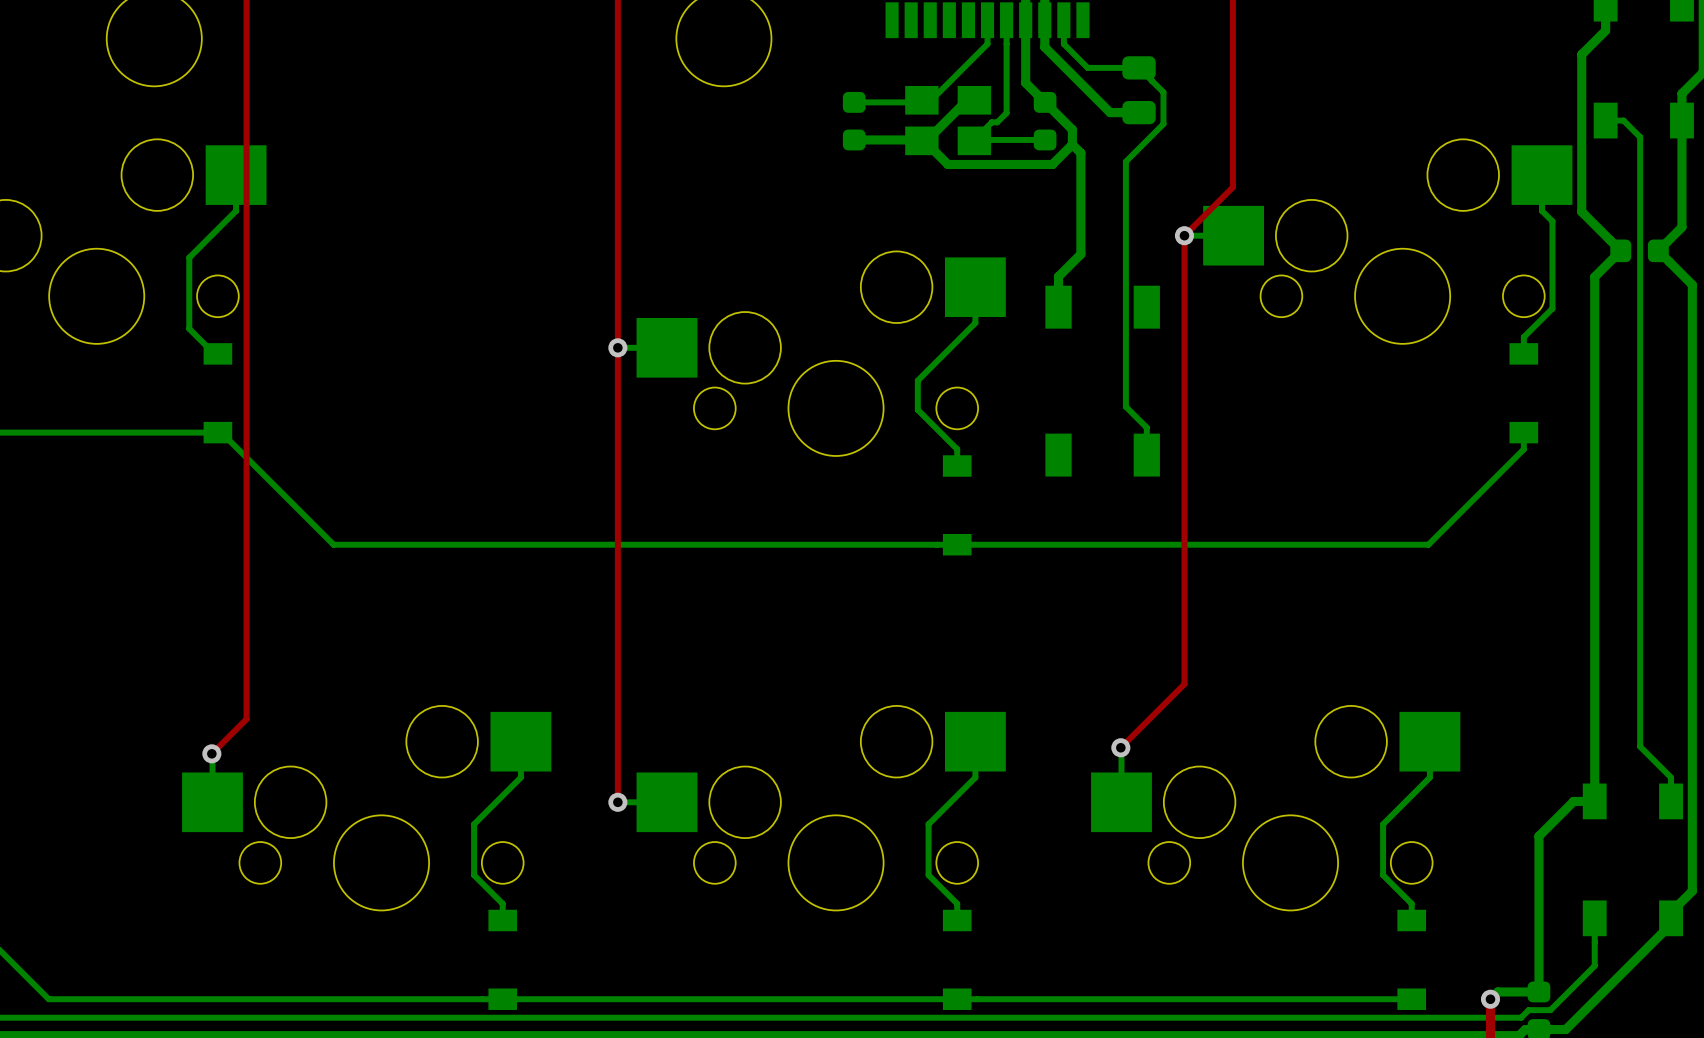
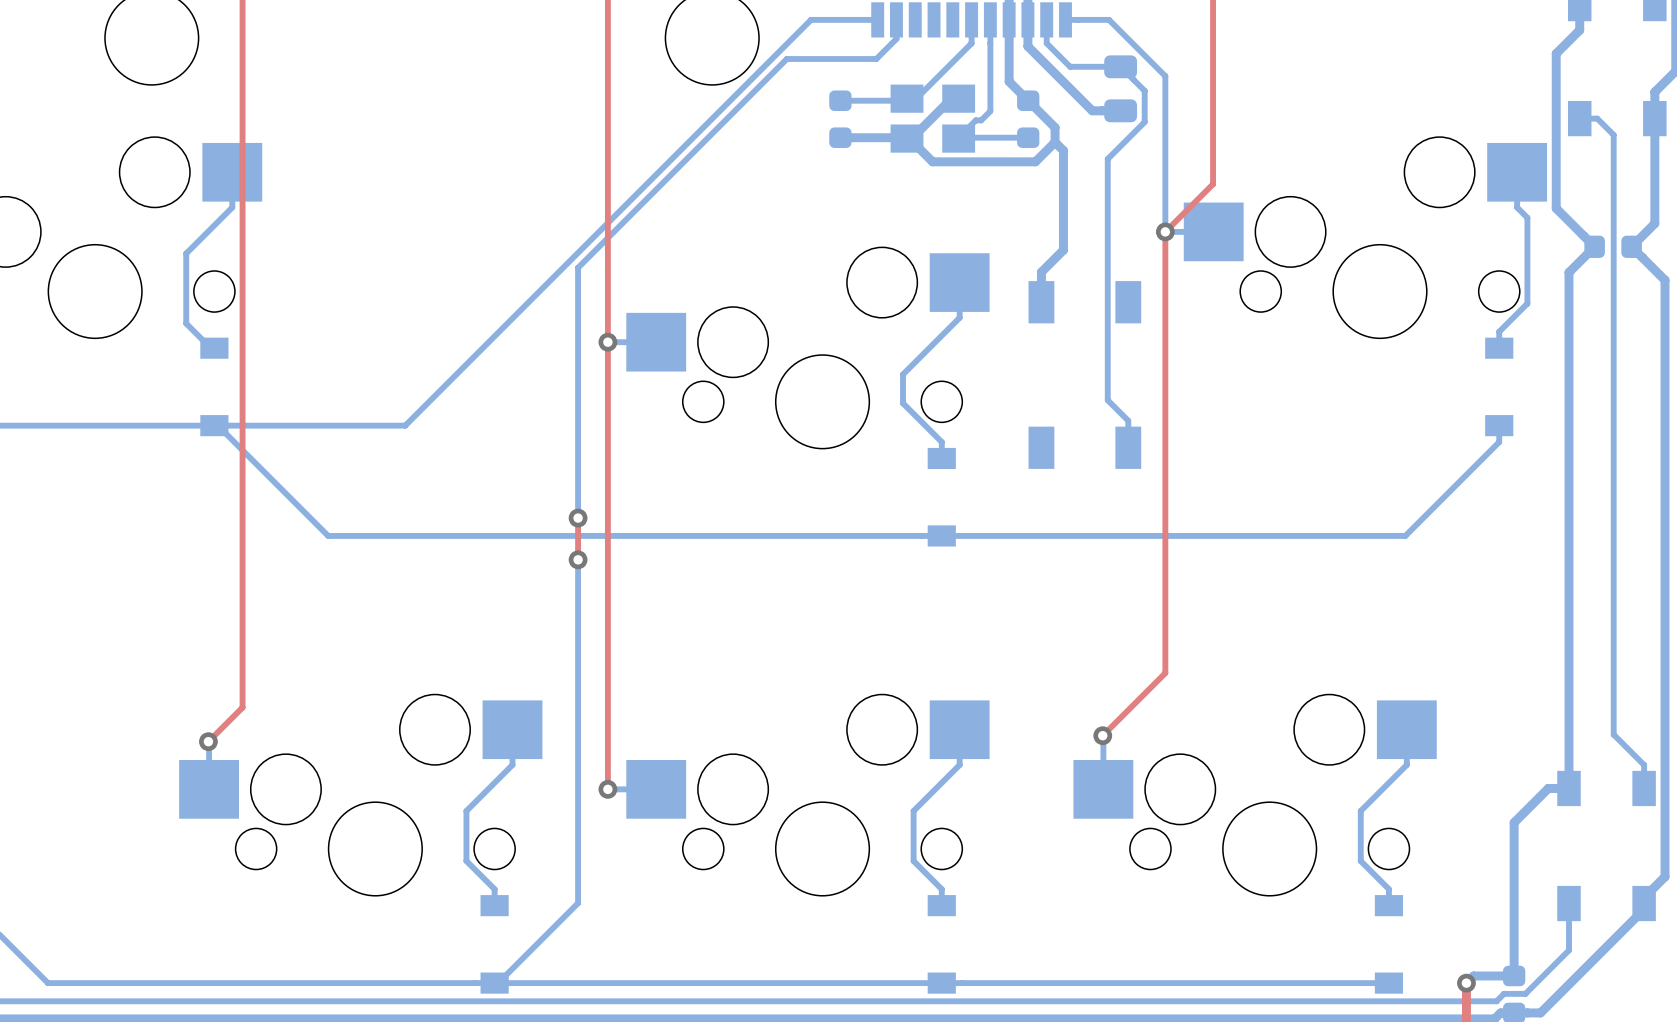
bottom track: none -> (877, 19) (811, 19) (405, 425) (217, 425)
bottom track: none -> (896, 19) (896, 38) (876, 59) (786, 59) (578, 267) (578, 518)
bottom track: none -> (1065, 19) (1109, 19) (1165, 76) (1165, 231)
top track: none -> (578, 518) (578, 559)
via: none -> (578, 518)
bottom track: none -> (578, 559) (578, 903) (498, 983)
via: none -> (578, 559)

